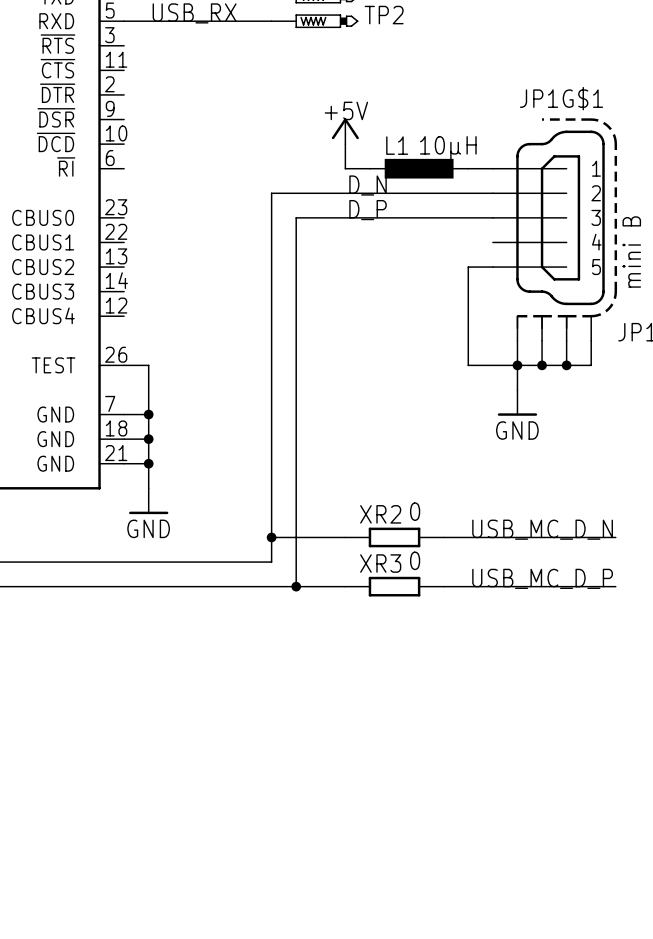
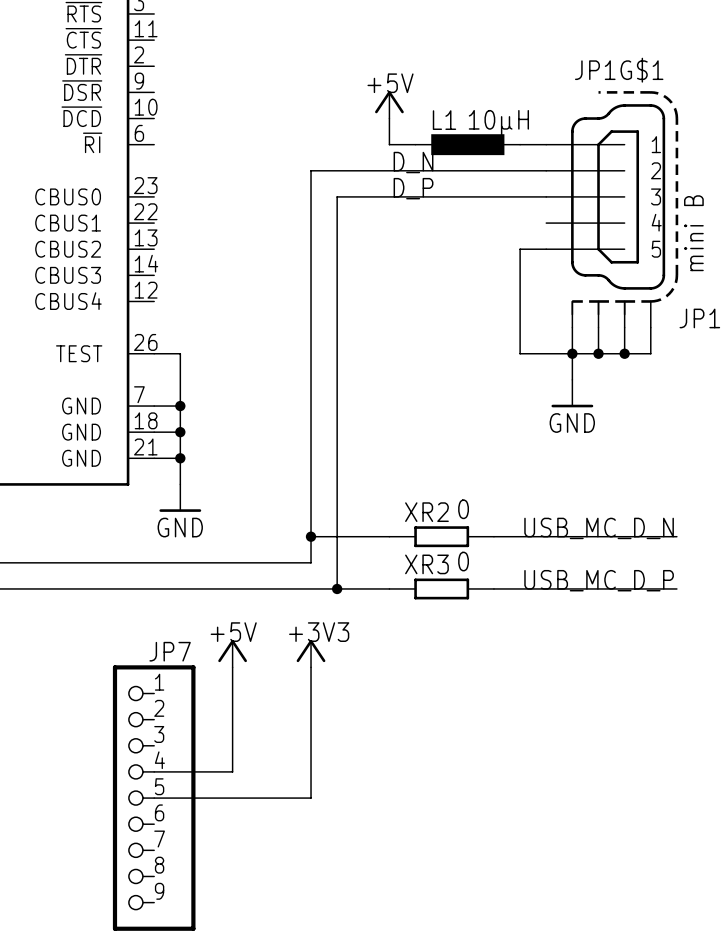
power symbol: none -> +5V (232, 653)
power symbol: none -> +3V3 (311, 653)
wire: none -> (232, 667) (232, 771) (154, 771)
wire: none -> (311, 667) (311, 798) (154, 798)
JP7: none -> (154, 798)

